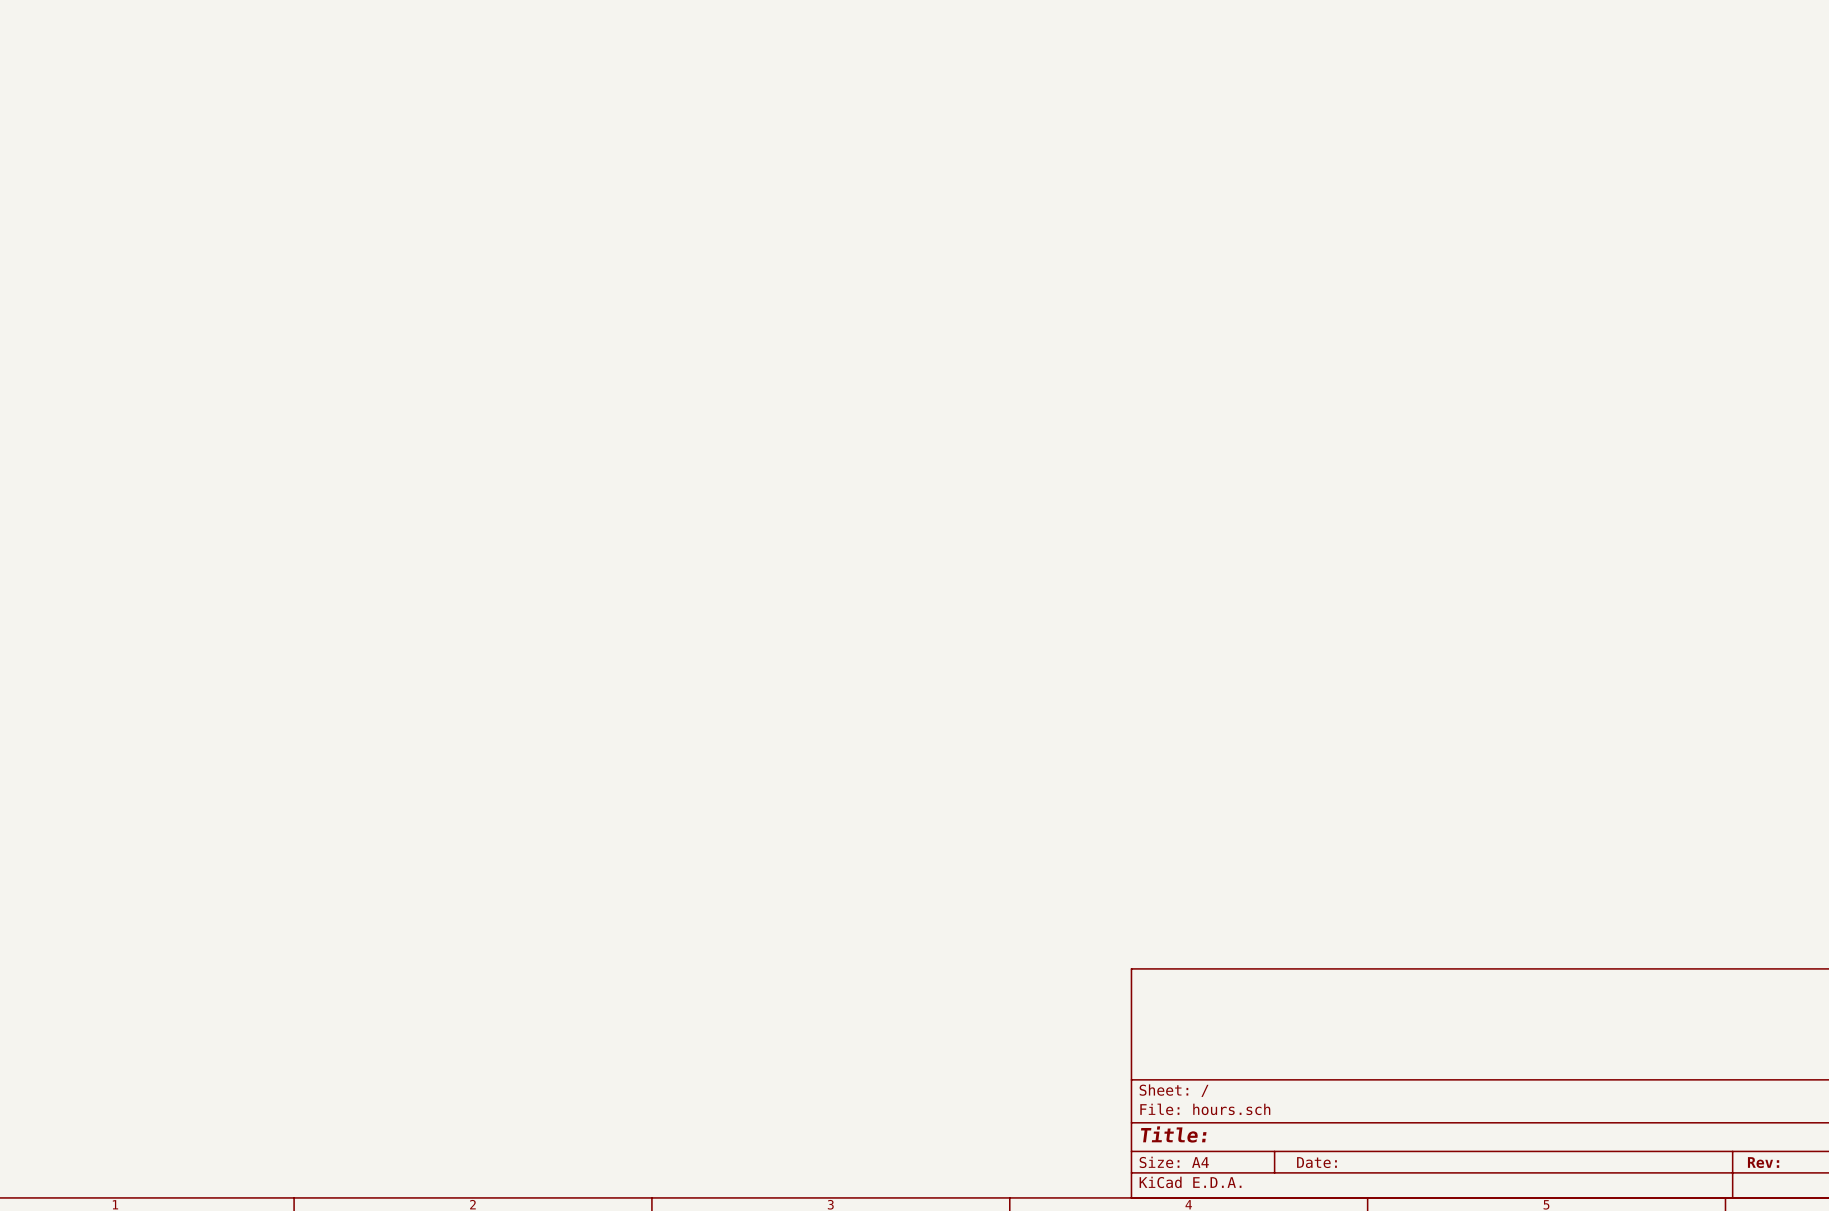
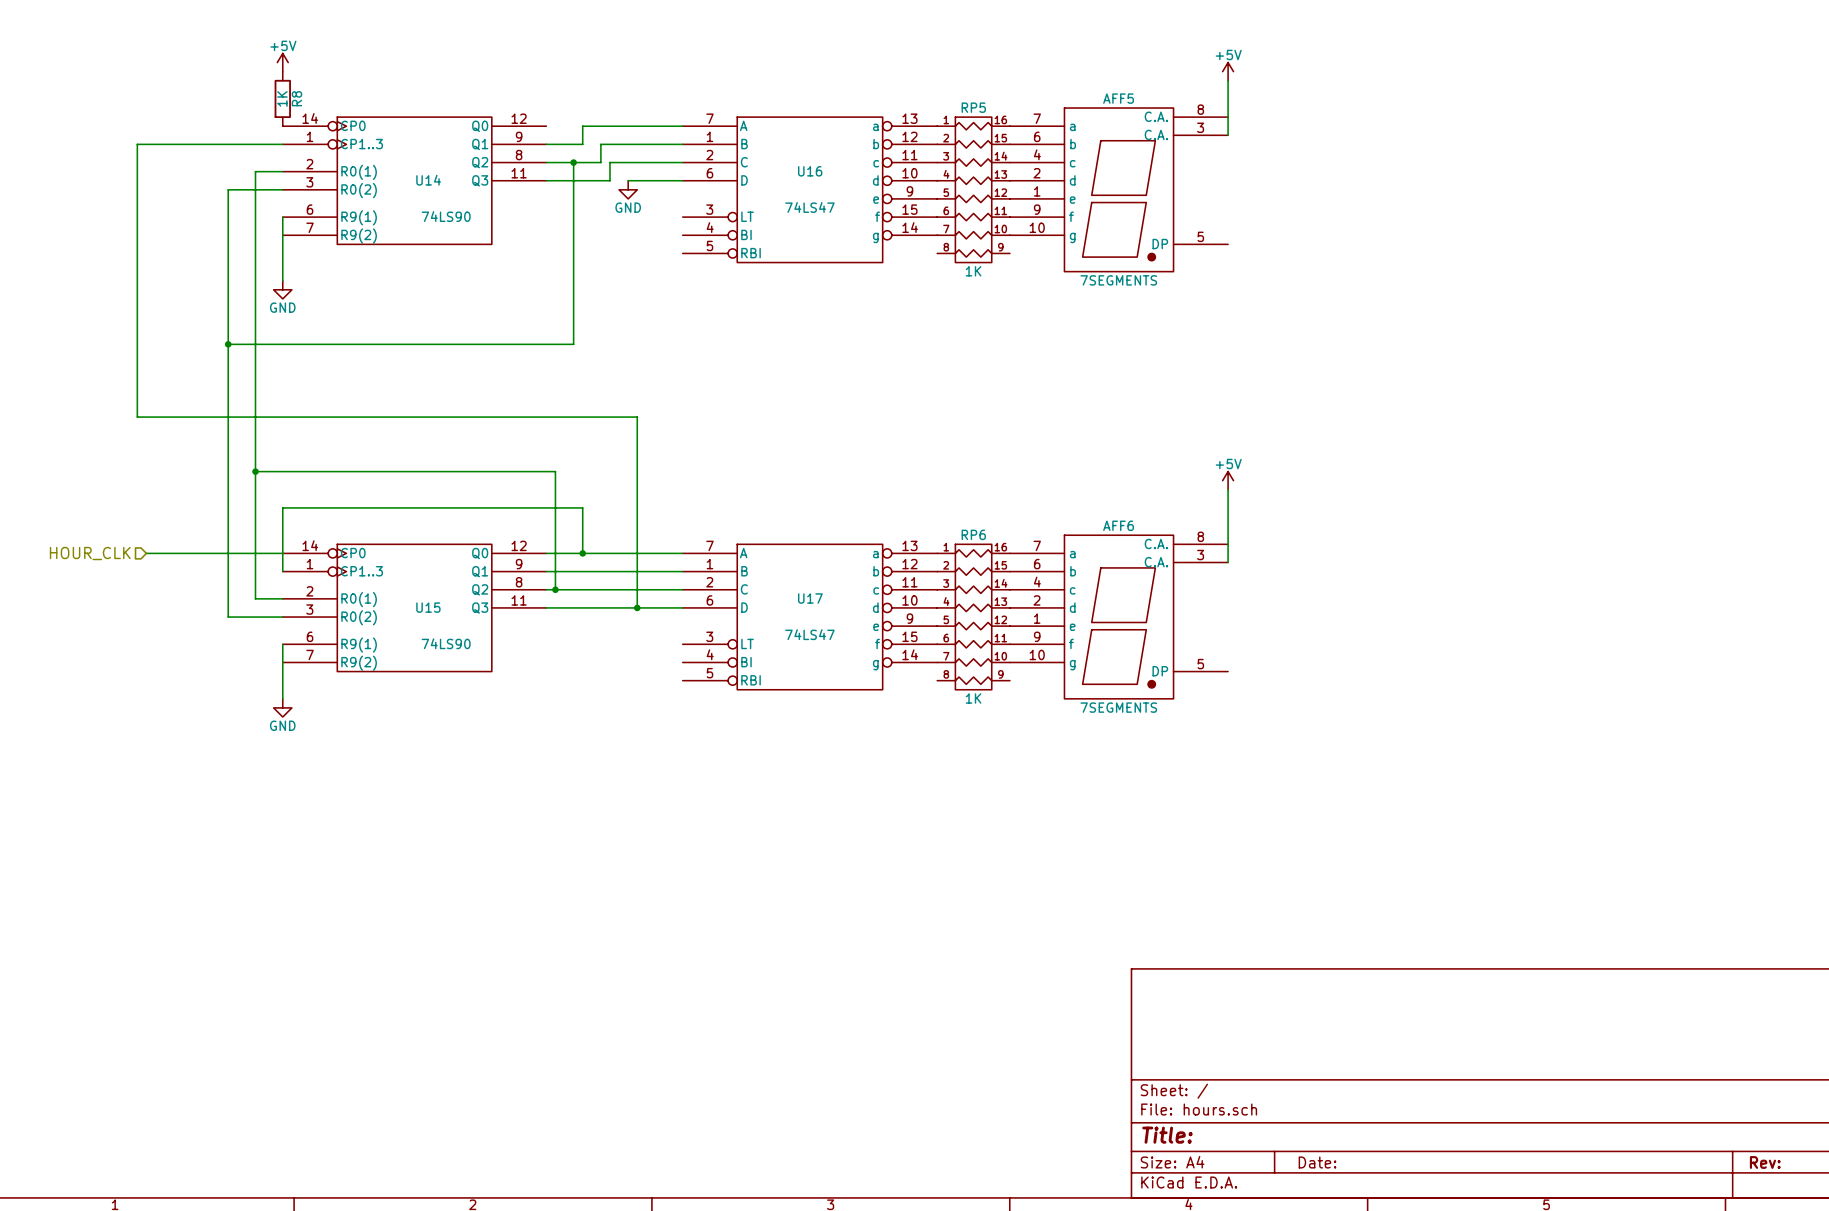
power symbol: none -> +5V (282, 62)
power symbol: none -> +5V (1228, 71)
wire: none -> (1228, 80) (1228, 135)
R8: none -> 1K (282, 98)
wire: none -> (682, 126) (582, 126) (582, 144) (546, 144)
wire: none -> (282, 144) (137, 144) (137, 417) (637, 417) (637, 607)
wire: none -> (682, 144) (600, 144) (600, 162) (546, 162)
wire: none -> (573, 162) (573, 344) (228, 344)
junction: none -> (573, 162)
wire: none -> (682, 162) (609, 162) (609, 180) (546, 180)
wire: none -> (282, 171) (255, 171) (255, 598) (282, 598)
U14: none -> 74LS90 (414, 180)
wire: none -> (628, 180) (682, 180)
wire: none -> (282, 189) (228, 189) (228, 617) (282, 617)
power symbol: none -> GND (628, 189)
U16: none -> 74LS47 (809, 189)
RP5: none -> 1K (973, 189)
AFF5: none -> 7SEGMENTS (1119, 189)
wire: none -> (282, 217) (282, 280)
power symbol: none -> GND (282, 289)
junction: none -> (228, 344)
wire: none -> (255, 471) (555, 471) (555, 589)
junction: none -> (255, 471)
power symbol: none -> +5V (1228, 480)
wire: none -> (1228, 489) (1228, 562)
wire: none -> (146, 553) (282, 553)
wire: none -> (546, 553) (682, 553)
wire: none -> (582, 553) (582, 507) (282, 507) (282, 571)
junction: none -> (582, 553)
hierarchical label: none -> HOUR_CLK (90, 553)
wire: none -> (546, 571) (682, 571)
wire: none -> (546, 589) (682, 589)
junction: none -> (555, 589)
U15: none -> 74LS90 (414, 607)
wire: none -> (546, 607) (682, 607)
junction: none -> (637, 607)
U17: none -> 74LS47 (809, 617)
RP6: none -> 1K (973, 617)
AFF6: none -> 7SEGMENTS (1119, 617)
wire: none -> (282, 644) (282, 698)
power symbol: none -> GND (282, 707)

